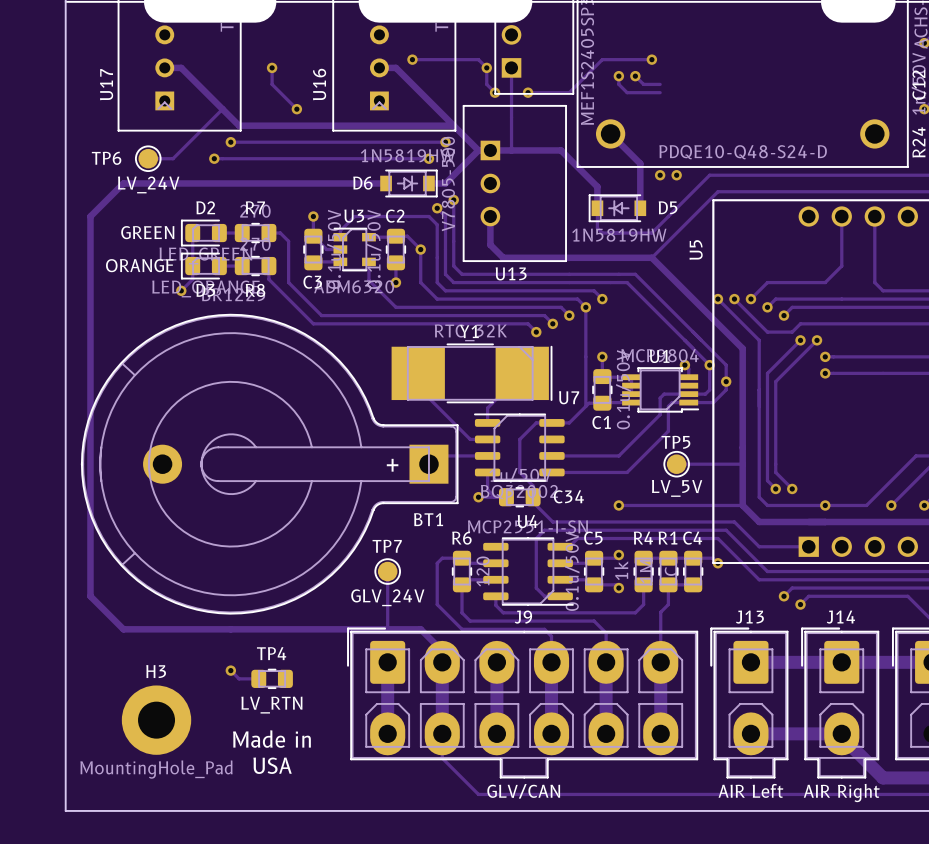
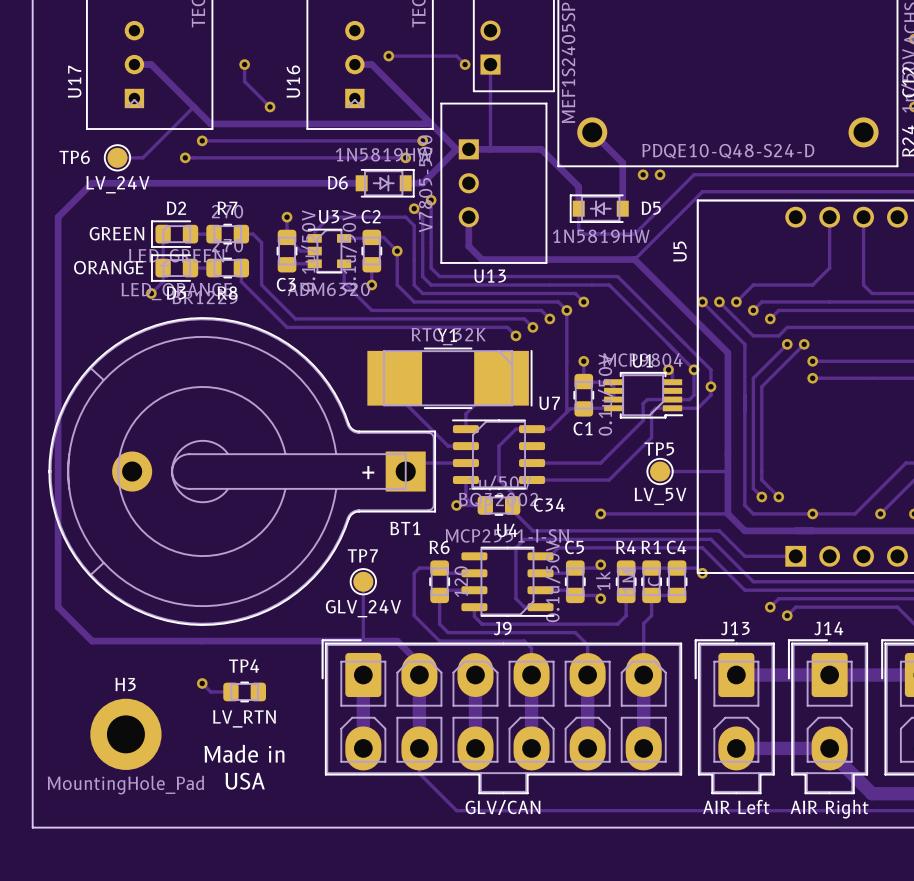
track: (651, 59) (602, 59) (569, 92) (528, 92) -> none
via: (651, 59) -> none
track: (486, 67) (486, 84) (495, 92) -> none
track: (618, 76) (618, 84) (627, 92) (660, 92) -> none
via: (618, 76) -> none
track: (635, 76) (643, 84) (660, 84) -> none
via: (635, 76) -> none
via: (495, 92) -> none
via: (528, 92) -> none

